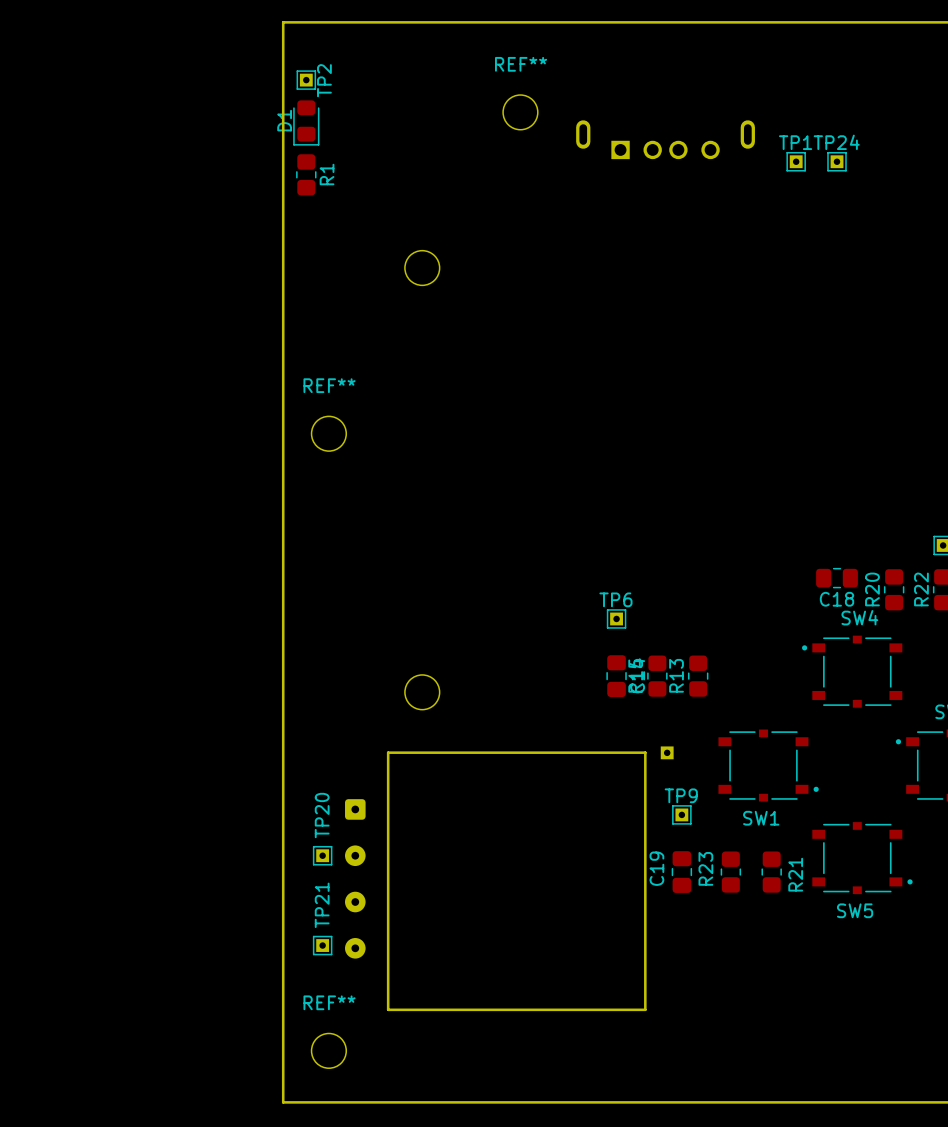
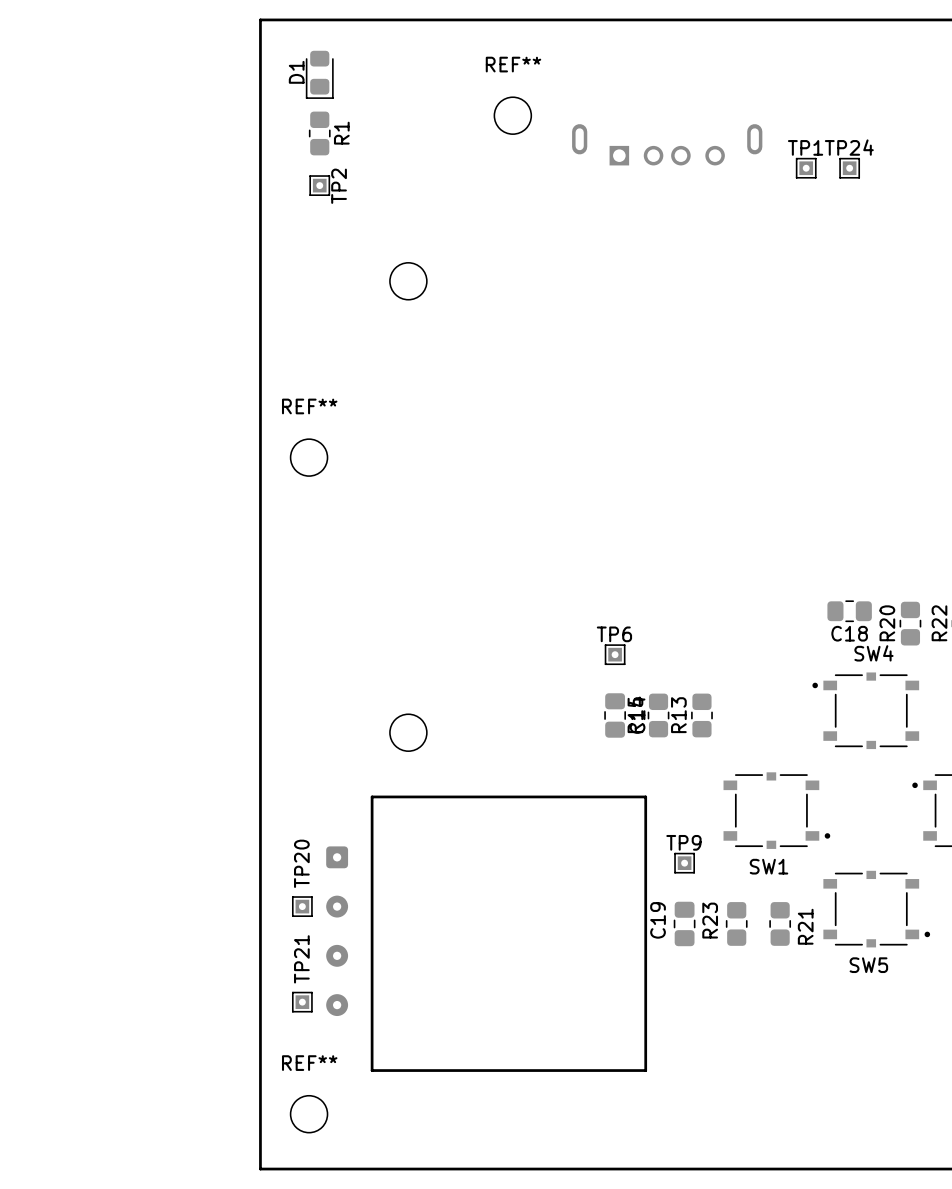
TP2 position: (306, 80) -> (319, 185)
D1 position: (306, 122) -> (319, 74)
R1 position: (306, 174) -> (319, 133)
part: (667, 752) -> none

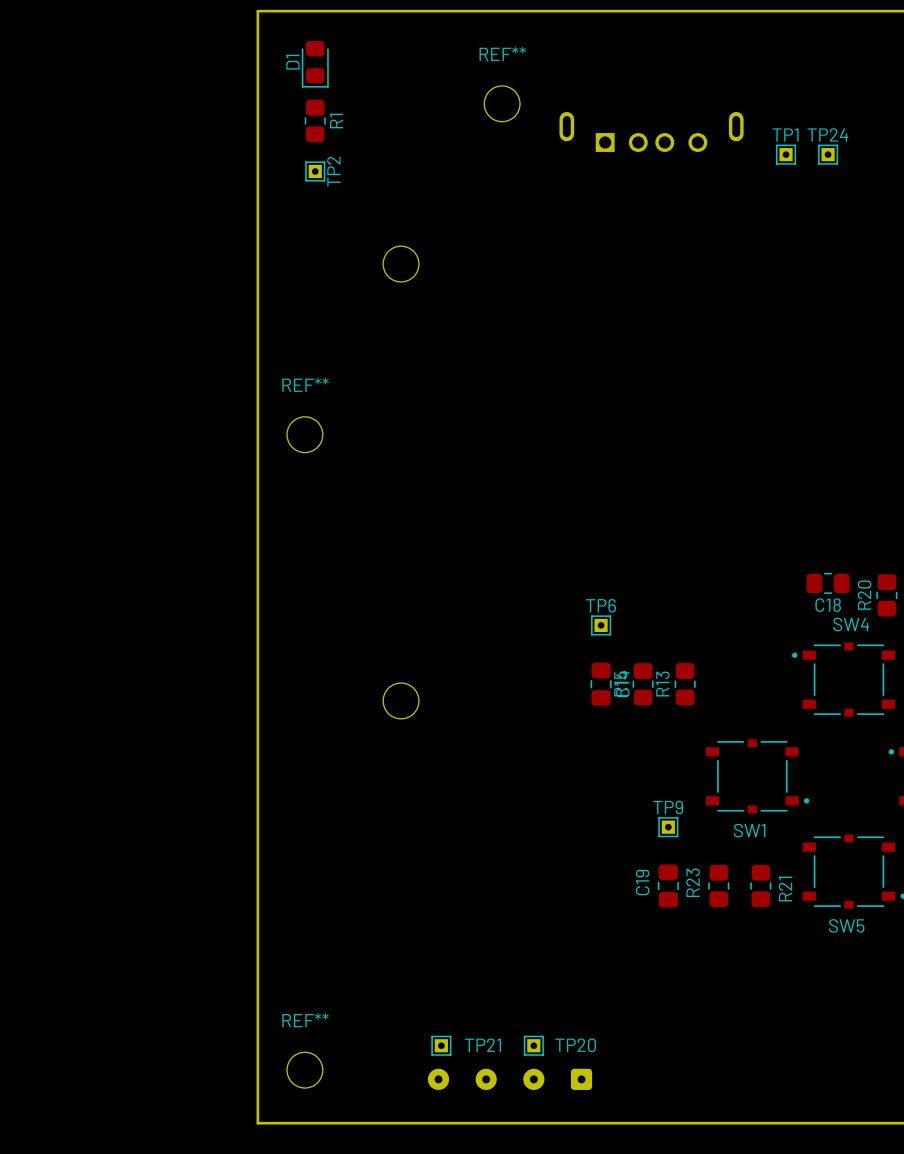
board edge: (372, 796) (645, 796) (645, 1070) (372, 1070) (372, 796) -> none
TP20 name rotation: 0° (301, 863) -> 90° clockwise (575, 1045)
TP20 name position: TP20 (301, 863) -> TP20 (575, 1045)
TP20 position: (302, 906) -> (533, 1045)
part rotation: 0° (337, 931) -> 90° clockwise (510, 1079)
part position: (337, 931) -> (510, 1079)
TP21 name rotation: 0° (301, 959) -> 90° clockwise (482, 1045)
TP21 name position: TP21 (301, 959) -> TP21 (482, 1045)
TP21 position: (302, 1002) -> (441, 1045)

